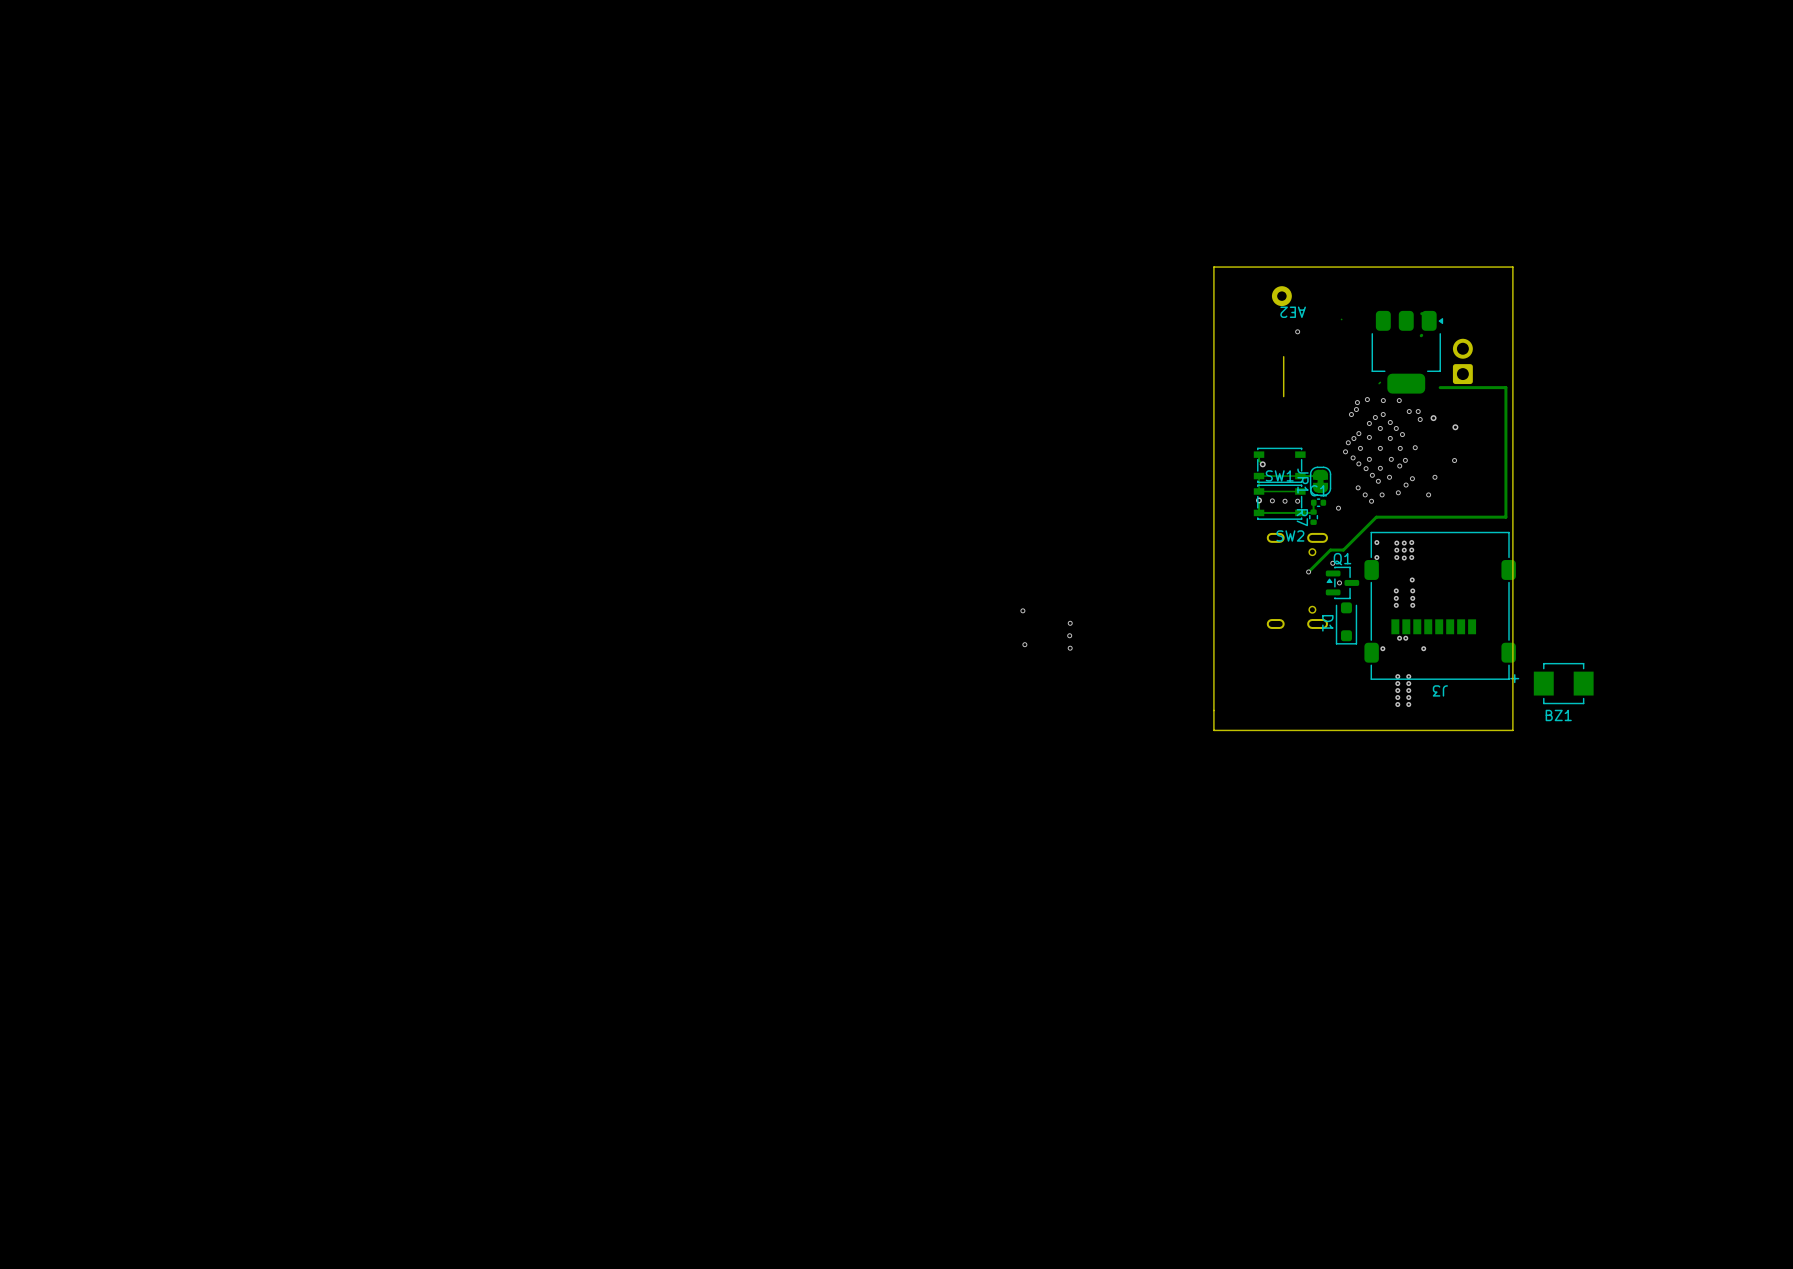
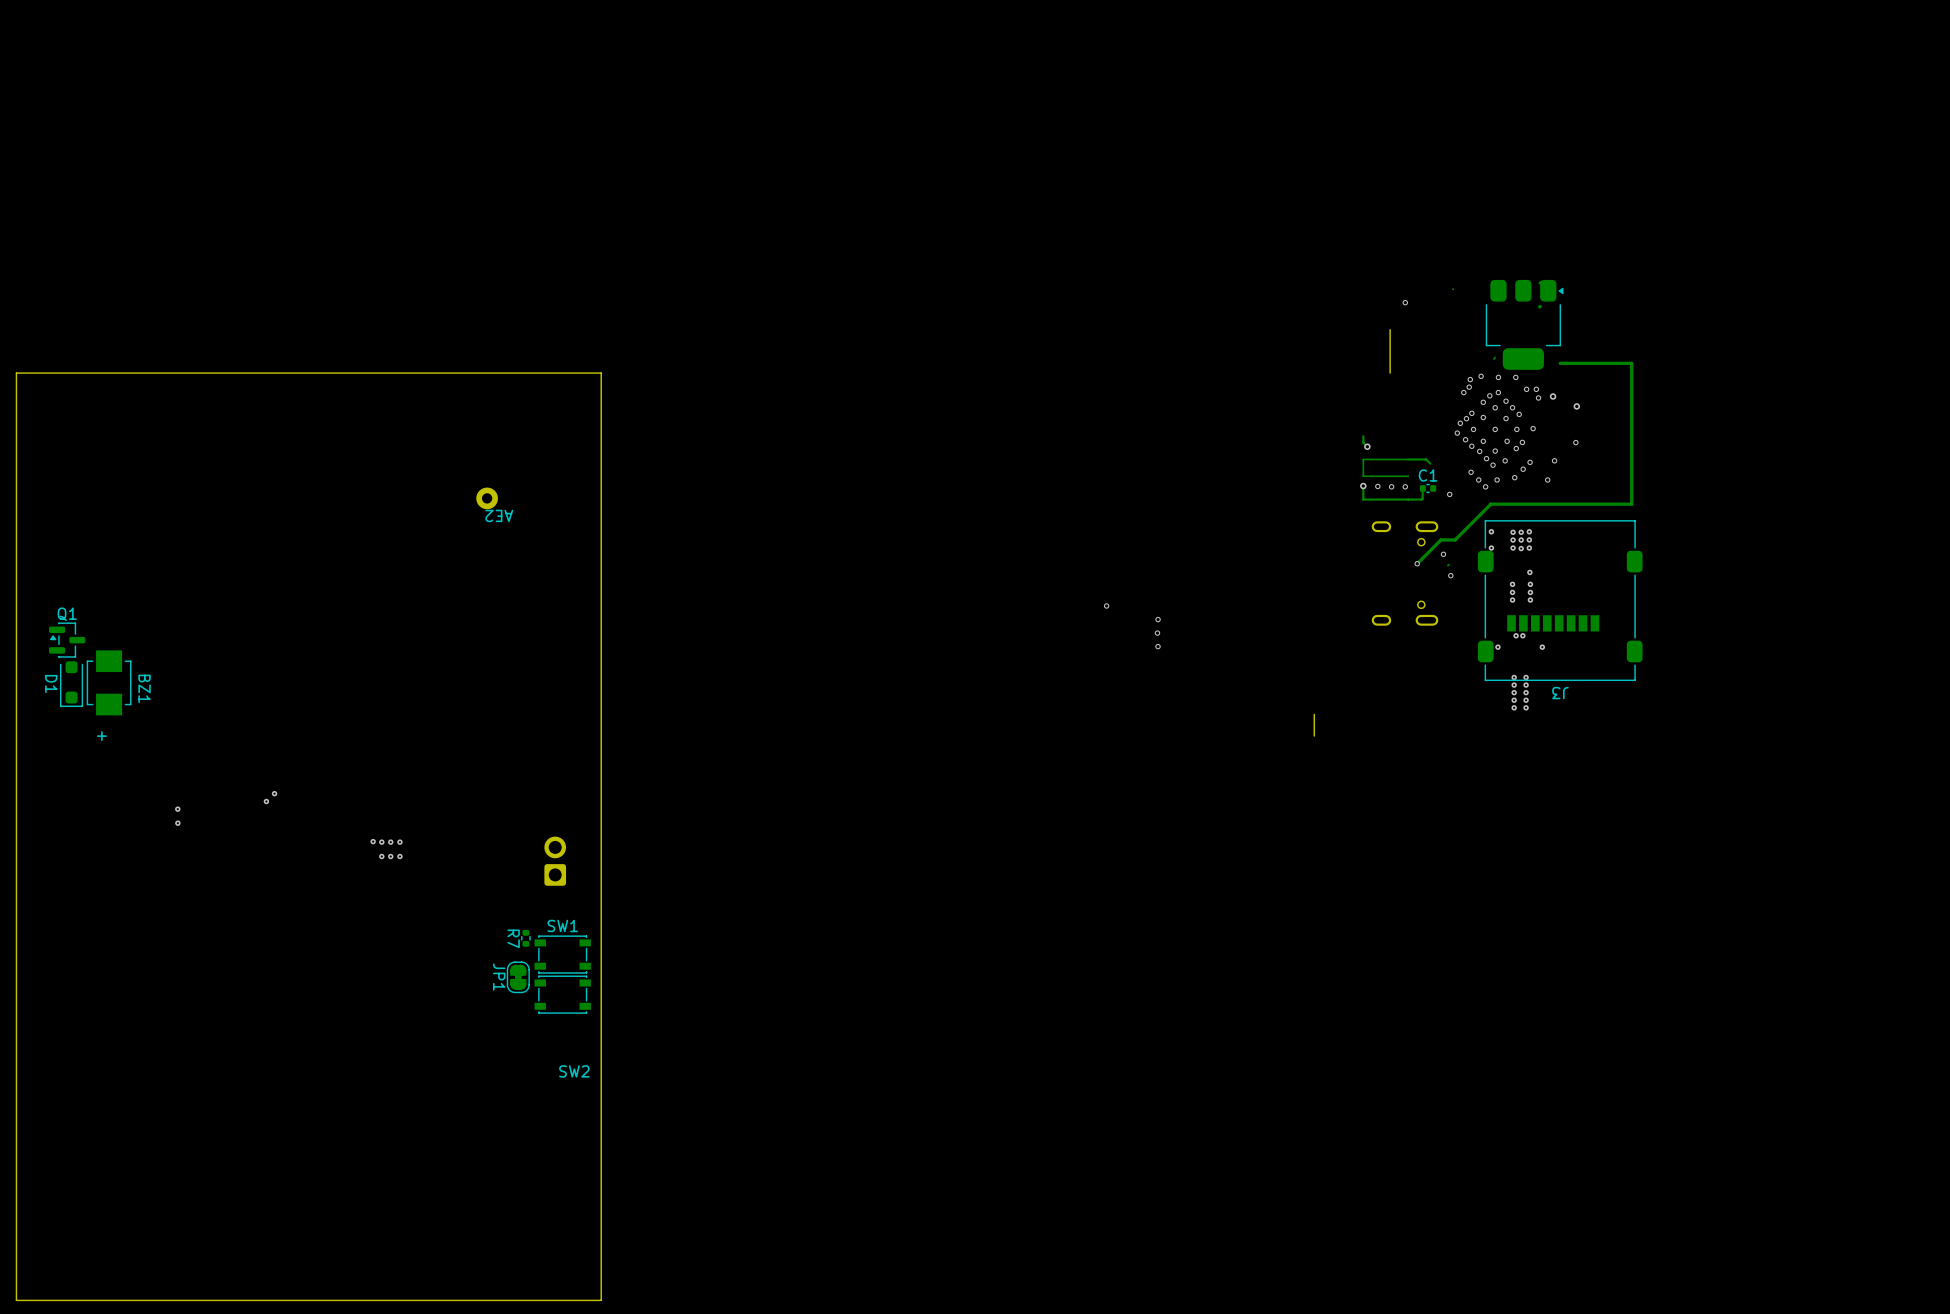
AE2 position: (1281, 296) -> (487, 498)
part: (1462, 361) -> none
board edge: none -> (601, 373) (16, 373) (16, 1300) (601, 1300) (601, 373)
SW2 position: (1279, 465) -> (562, 994)
JP1 position: (1320, 481) -> (518, 977)
SW1 position: (1279, 502) -> (562, 954)
R7 position: (1313, 517) -> (525, 938)
Q1 position: (1342, 582) -> (67, 640)
D1 position: (1346, 623) -> (71, 684)
via: (1024, 644) -> none
BZ1 rotation: 0° (1563, 683) -> 90° counterclockwise (109, 682)
BZ1 position: (1563, 683) -> (109, 682)
board edge: (1213, 710) (1213, 267) (1512, 267) (1512, 730) (1213, 730) -> none
via: none -> (274, 793)
via: none -> (266, 801)
via: none -> (177, 809)
via: none -> (177, 823)
via: none -> (373, 841)
via: none -> (381, 842)
via: none -> (390, 842)
via: none -> (399, 842)
via: none -> (381, 856)
via: none -> (390, 856)
via: none -> (399, 856)
part: none -> (555, 861)

